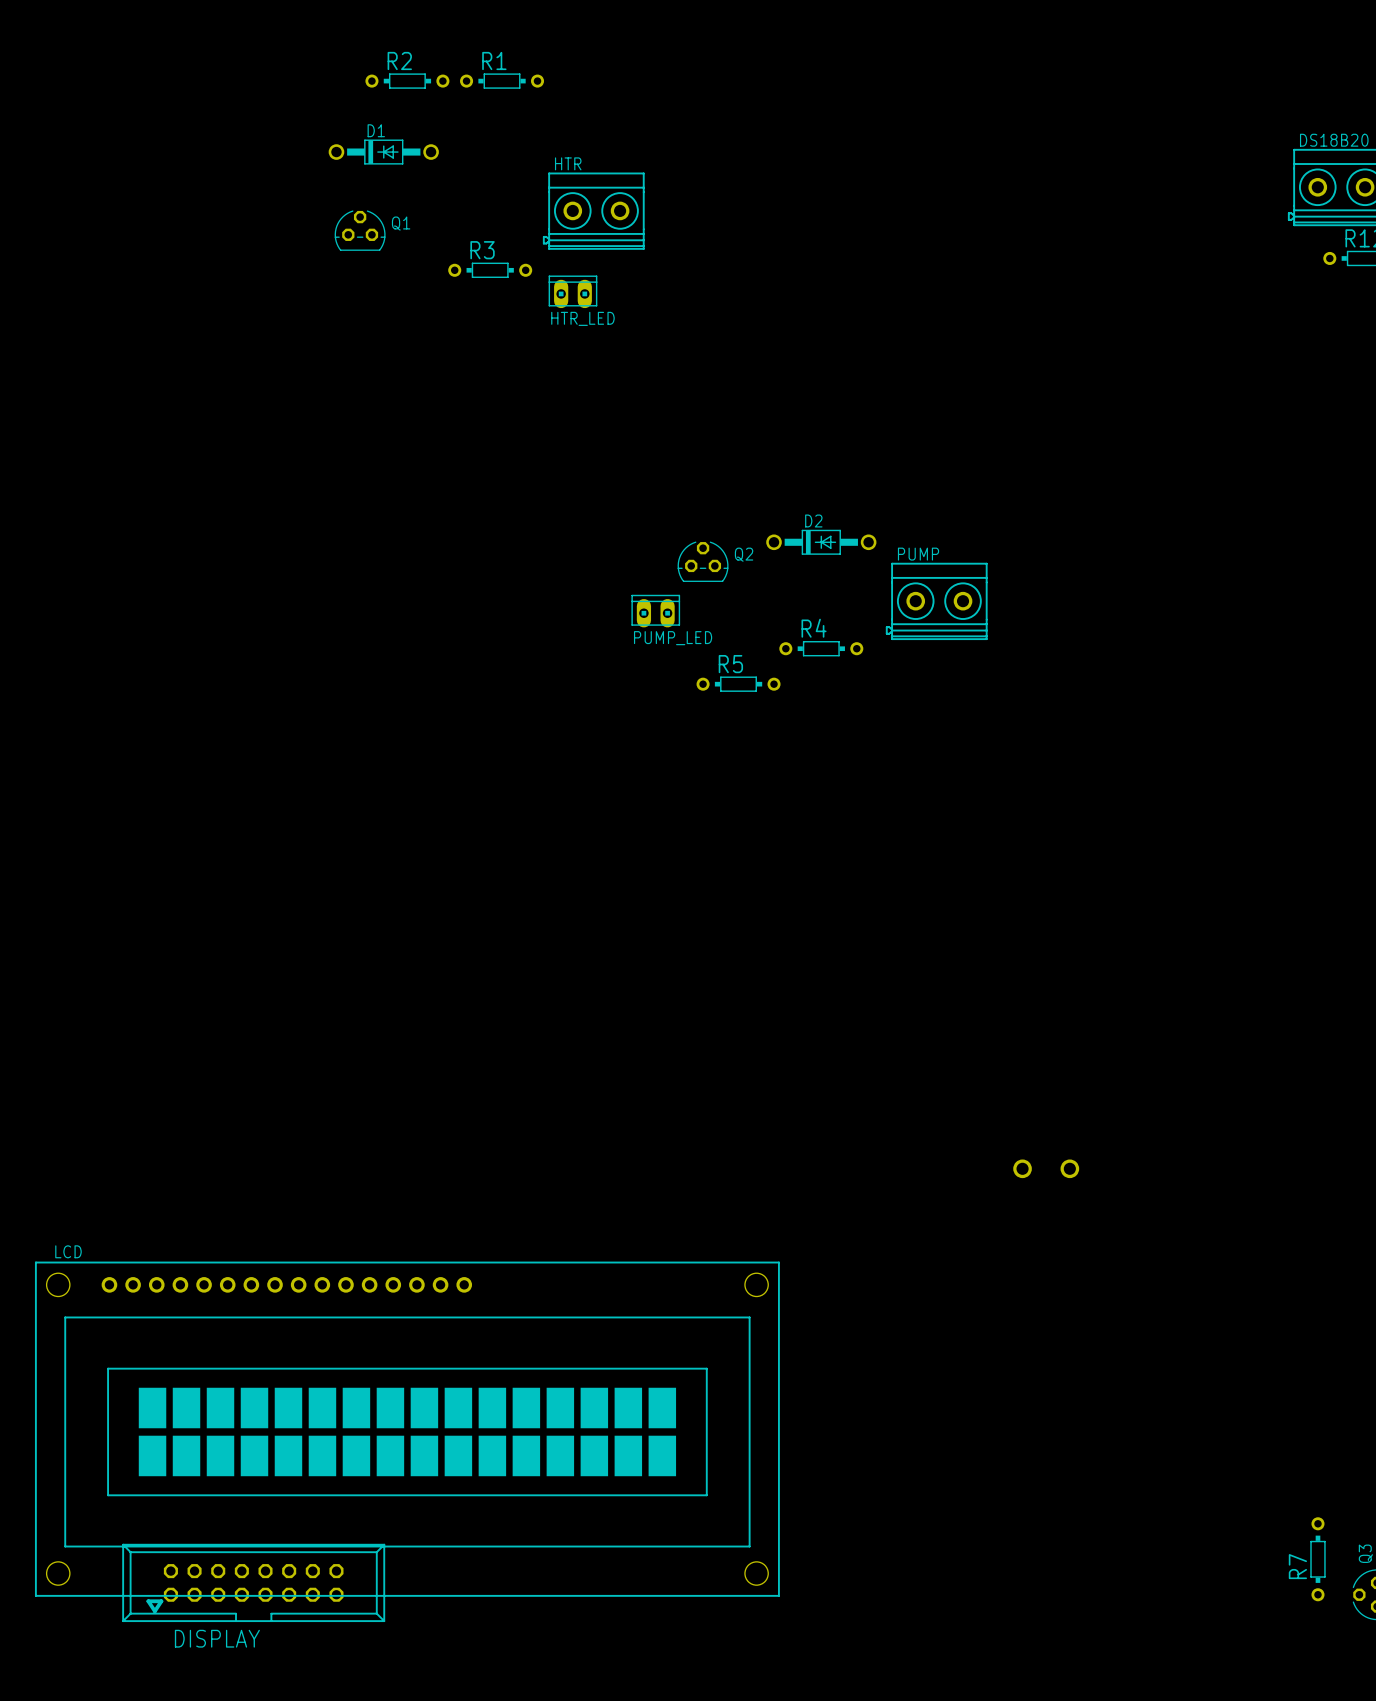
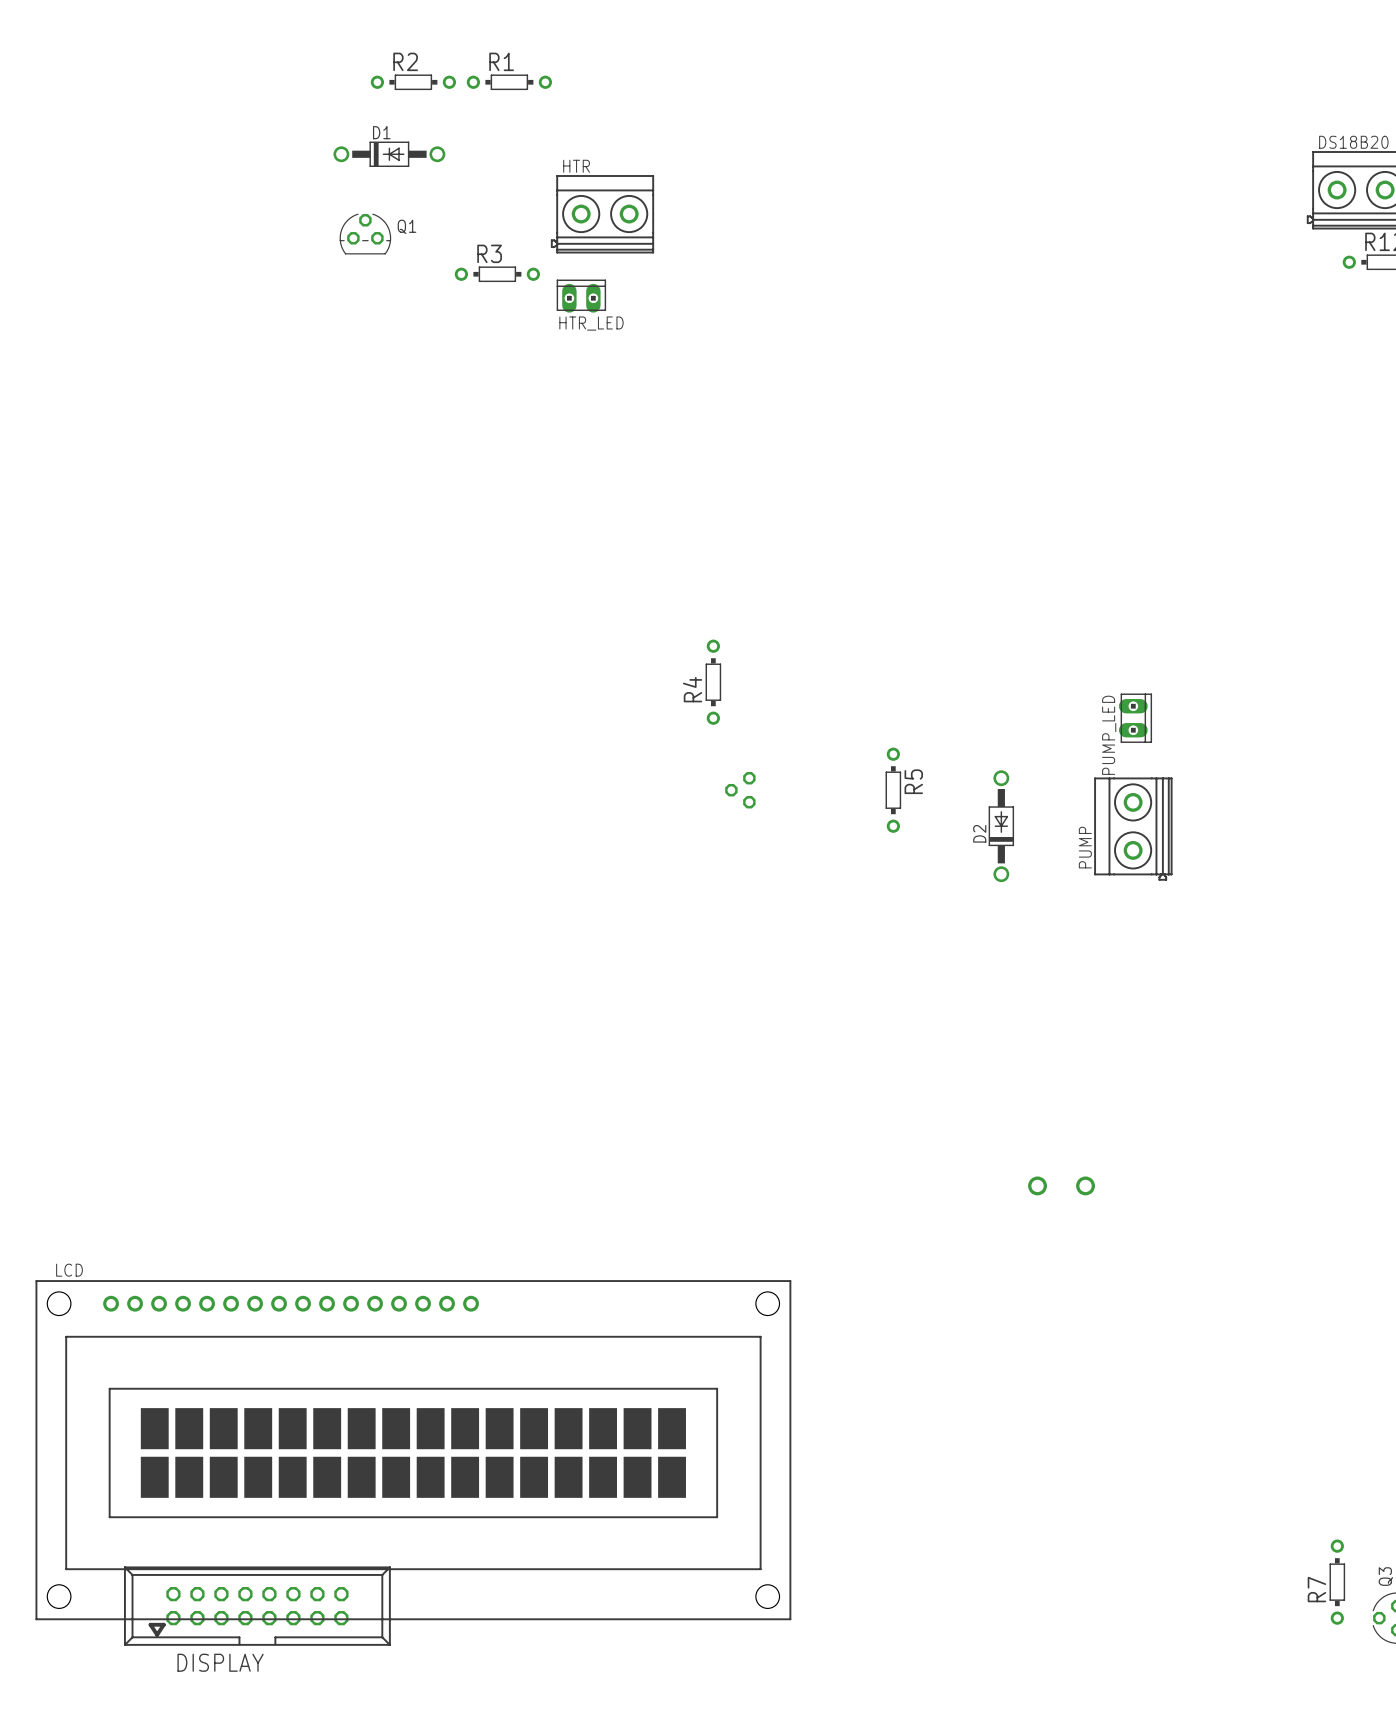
D2 rotation: 0° (821, 542) -> 90° counterclockwise (1001, 826)
D2 position: (821, 542) -> (1001, 826)
Q2 side: top (703, 561) -> bottom (740, 790)
PUMP: (936, 601) -> none
PUMP_LED: (655, 611) -> none
R4 name position: R4 (814, 628) -> R4 (692, 689)
R4 rotation: 0° (821, 648) -> 90° clockwise (713, 682)
R4 position: (821, 648) -> (713, 682)
R5 rotation: 0° (738, 684) -> 90° clockwise (893, 790)
R5 position: (738, 684) -> (893, 790)
PUMP_LED: none -> (1135, 718)
PUMP: none -> (1133, 829)

